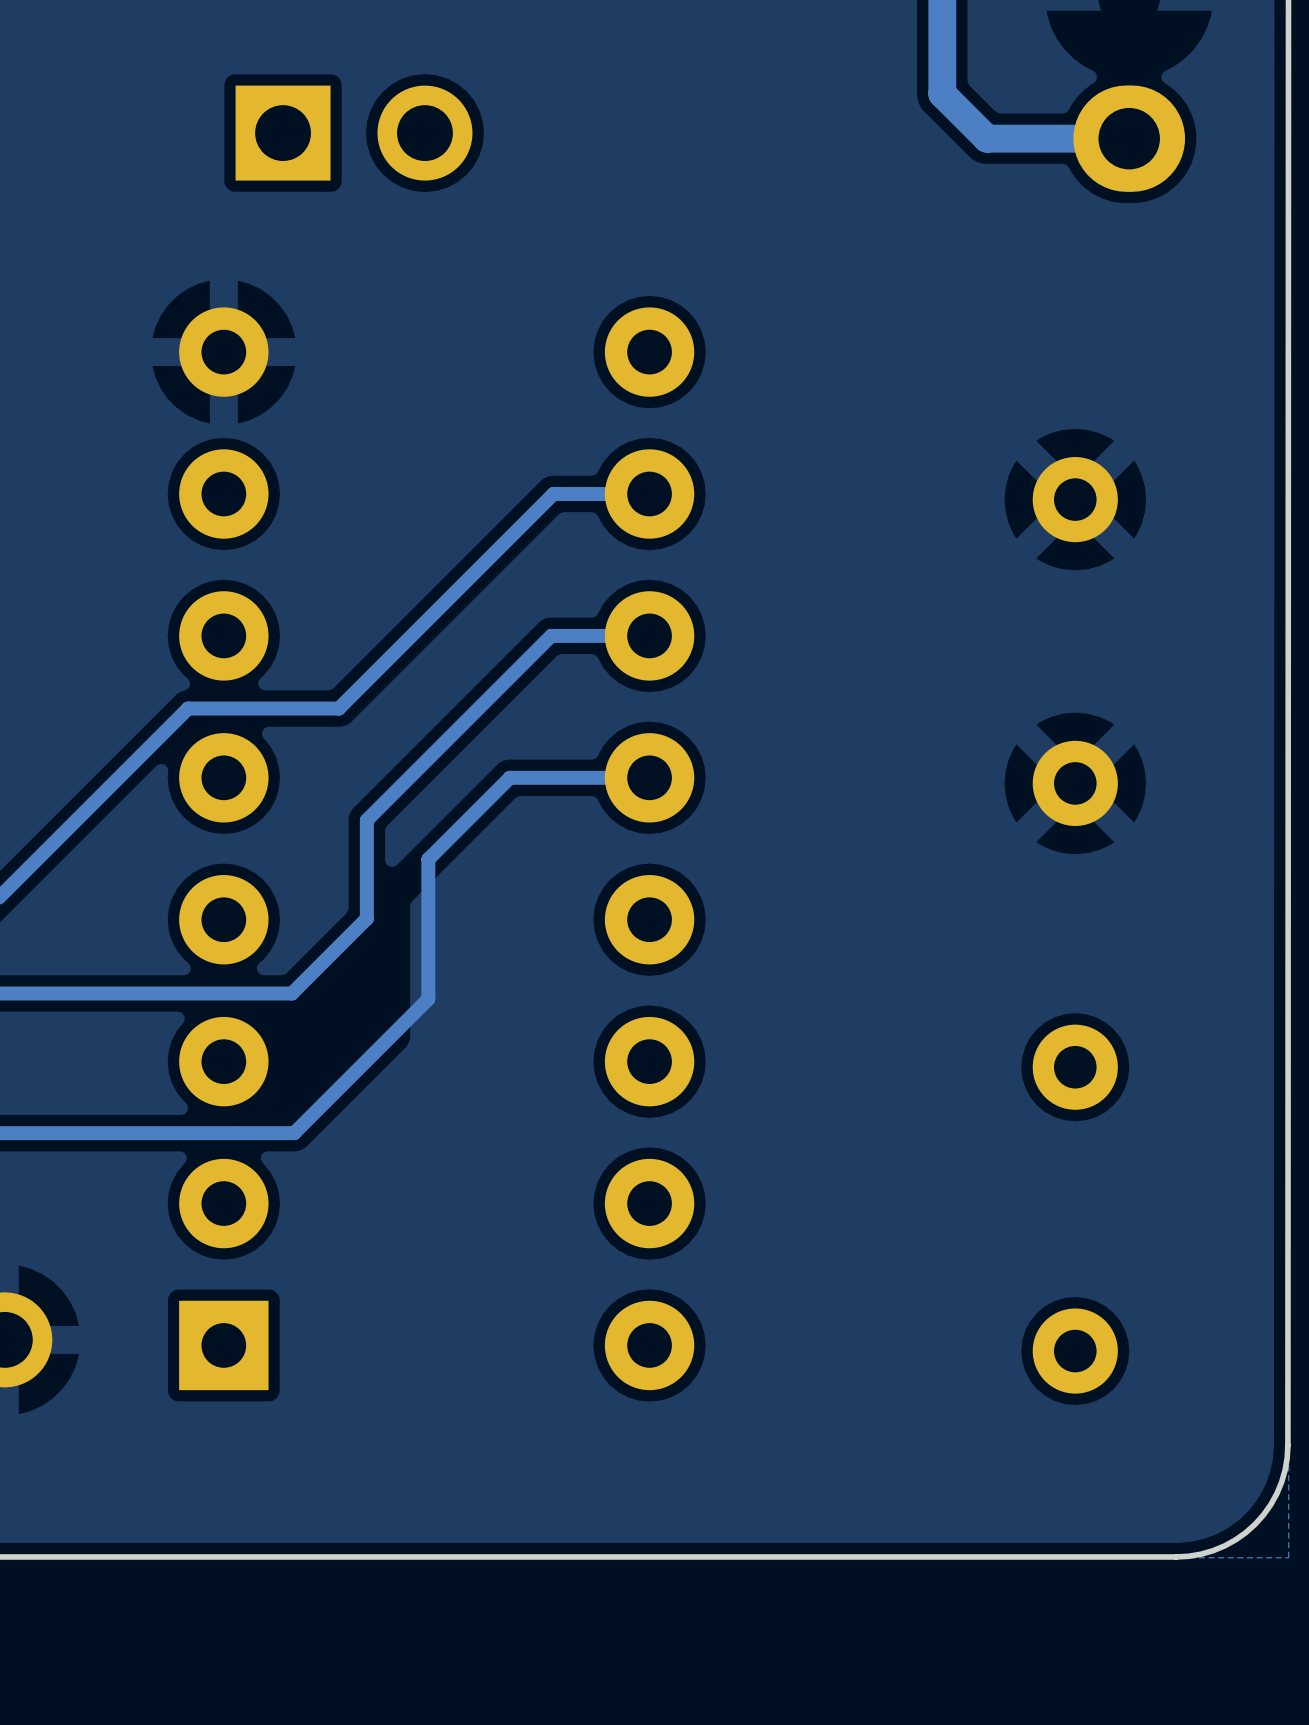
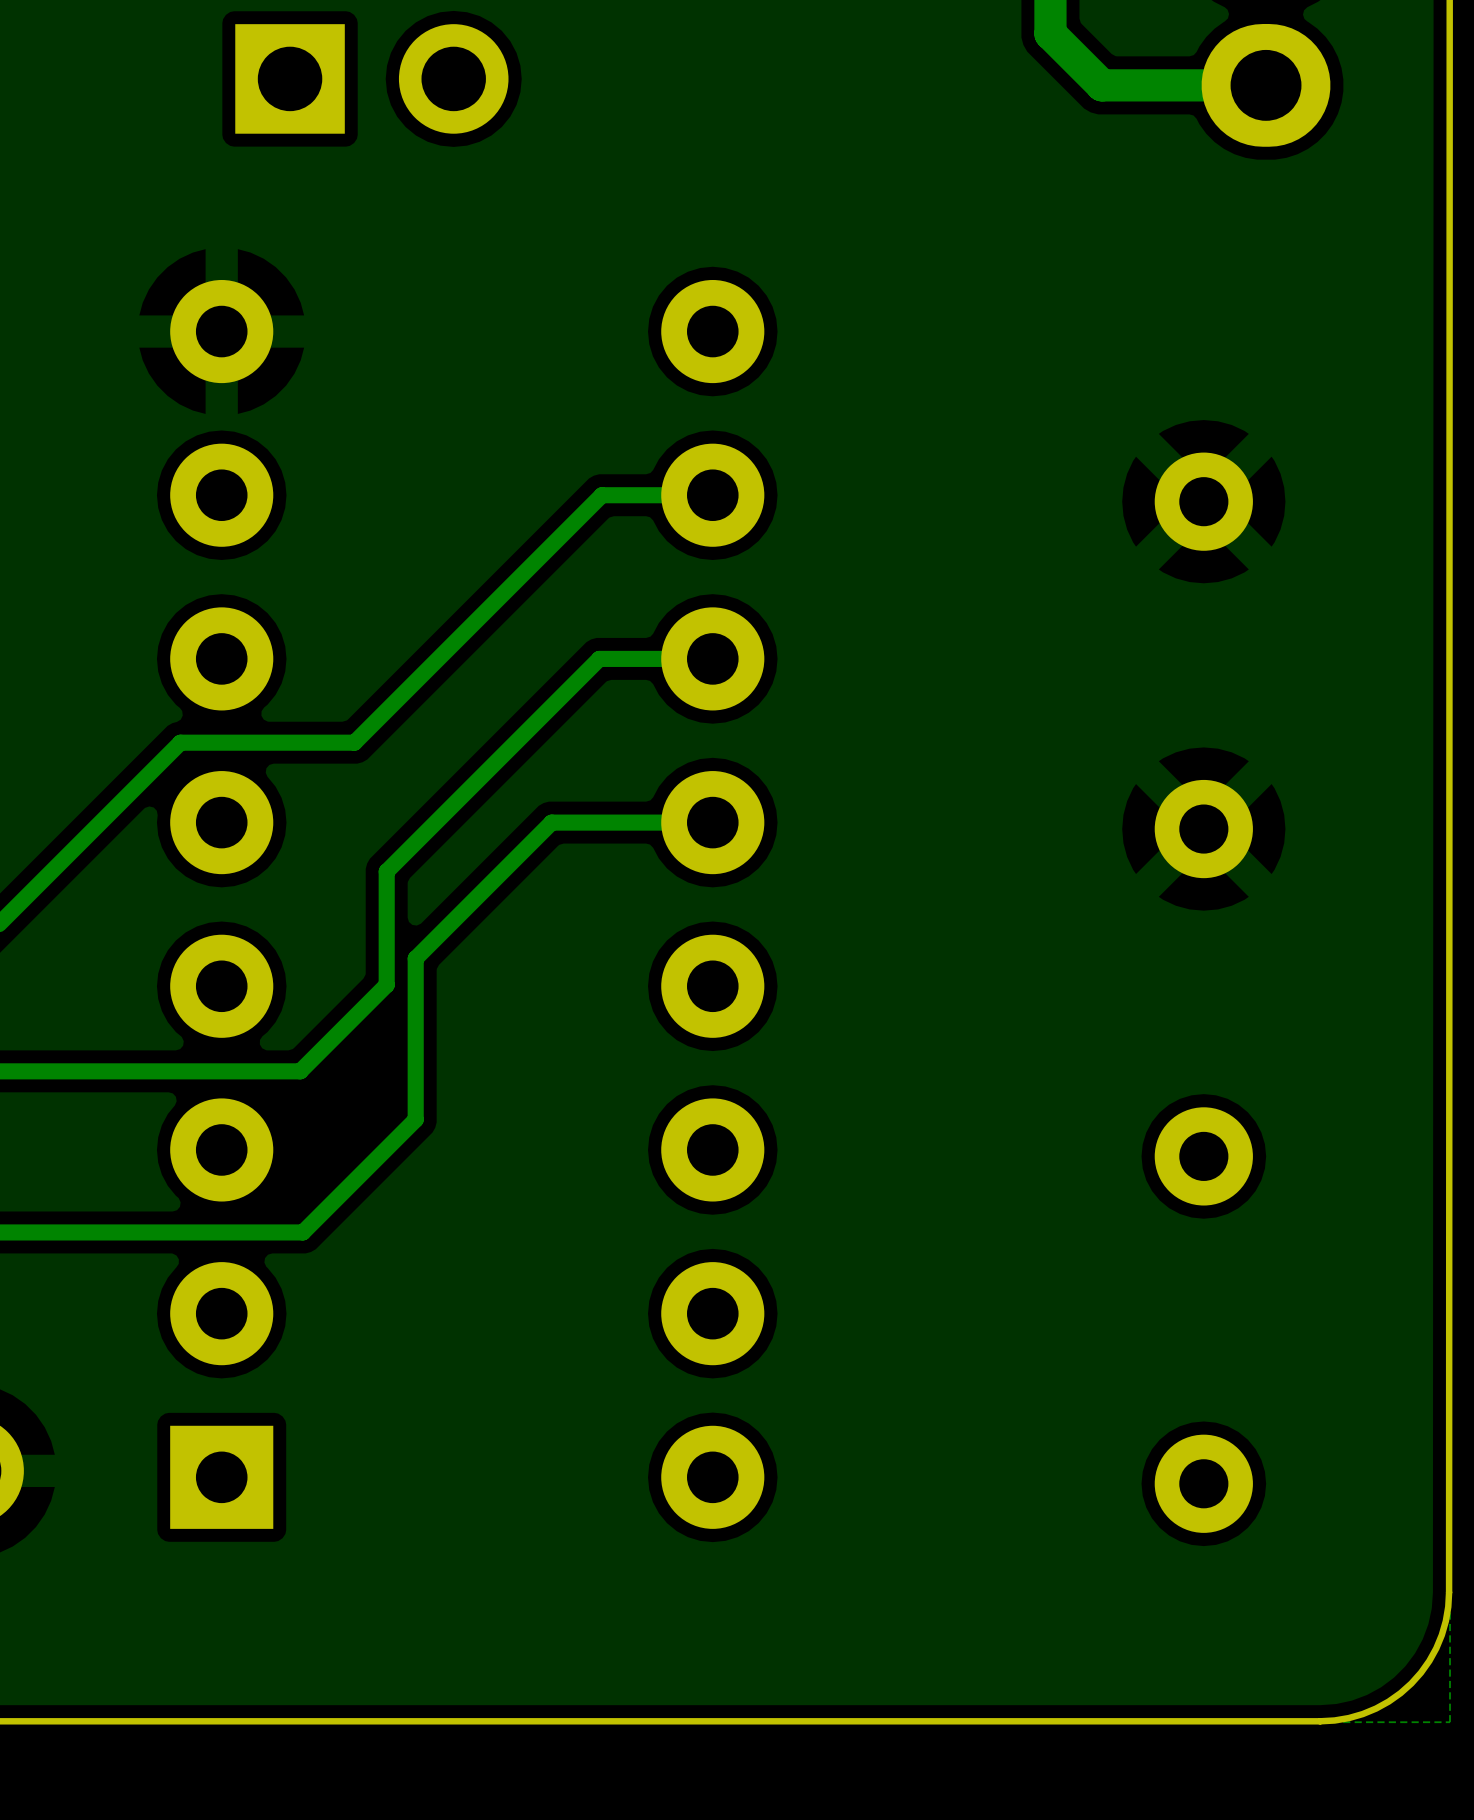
track: (428, 859) (428, 999) (392, 1035) -> (457, 916) (415, 958) (415, 1119)

